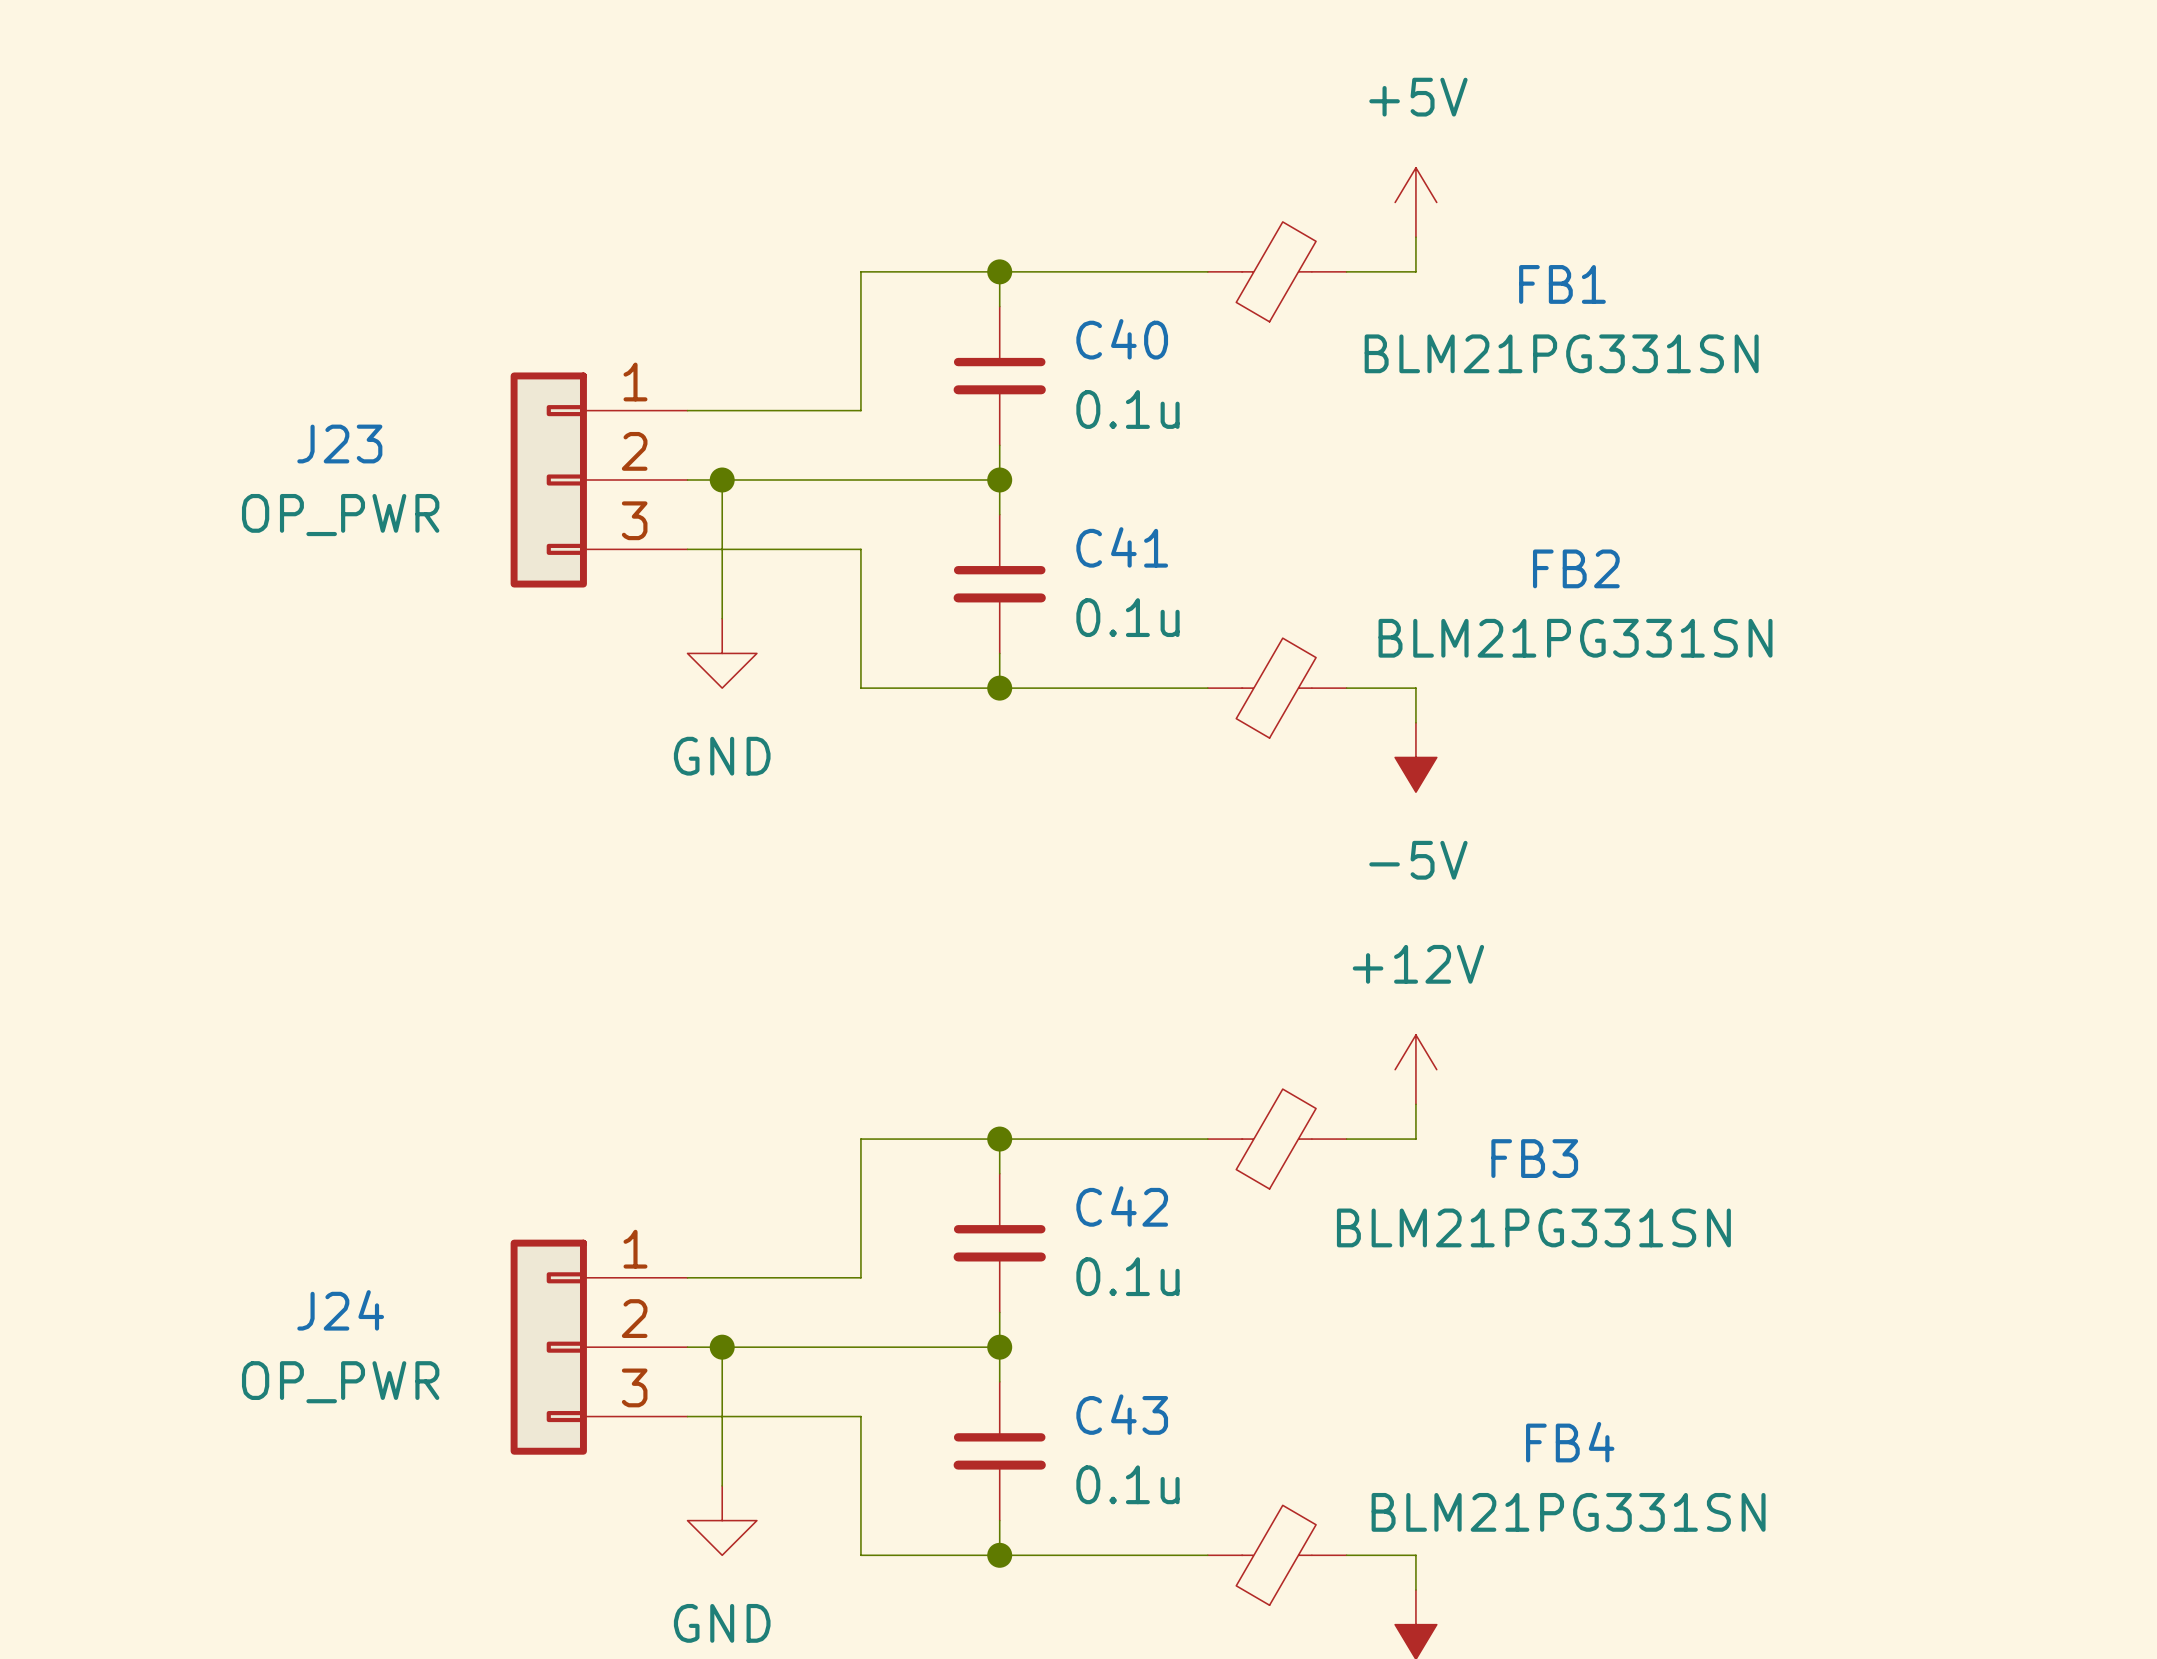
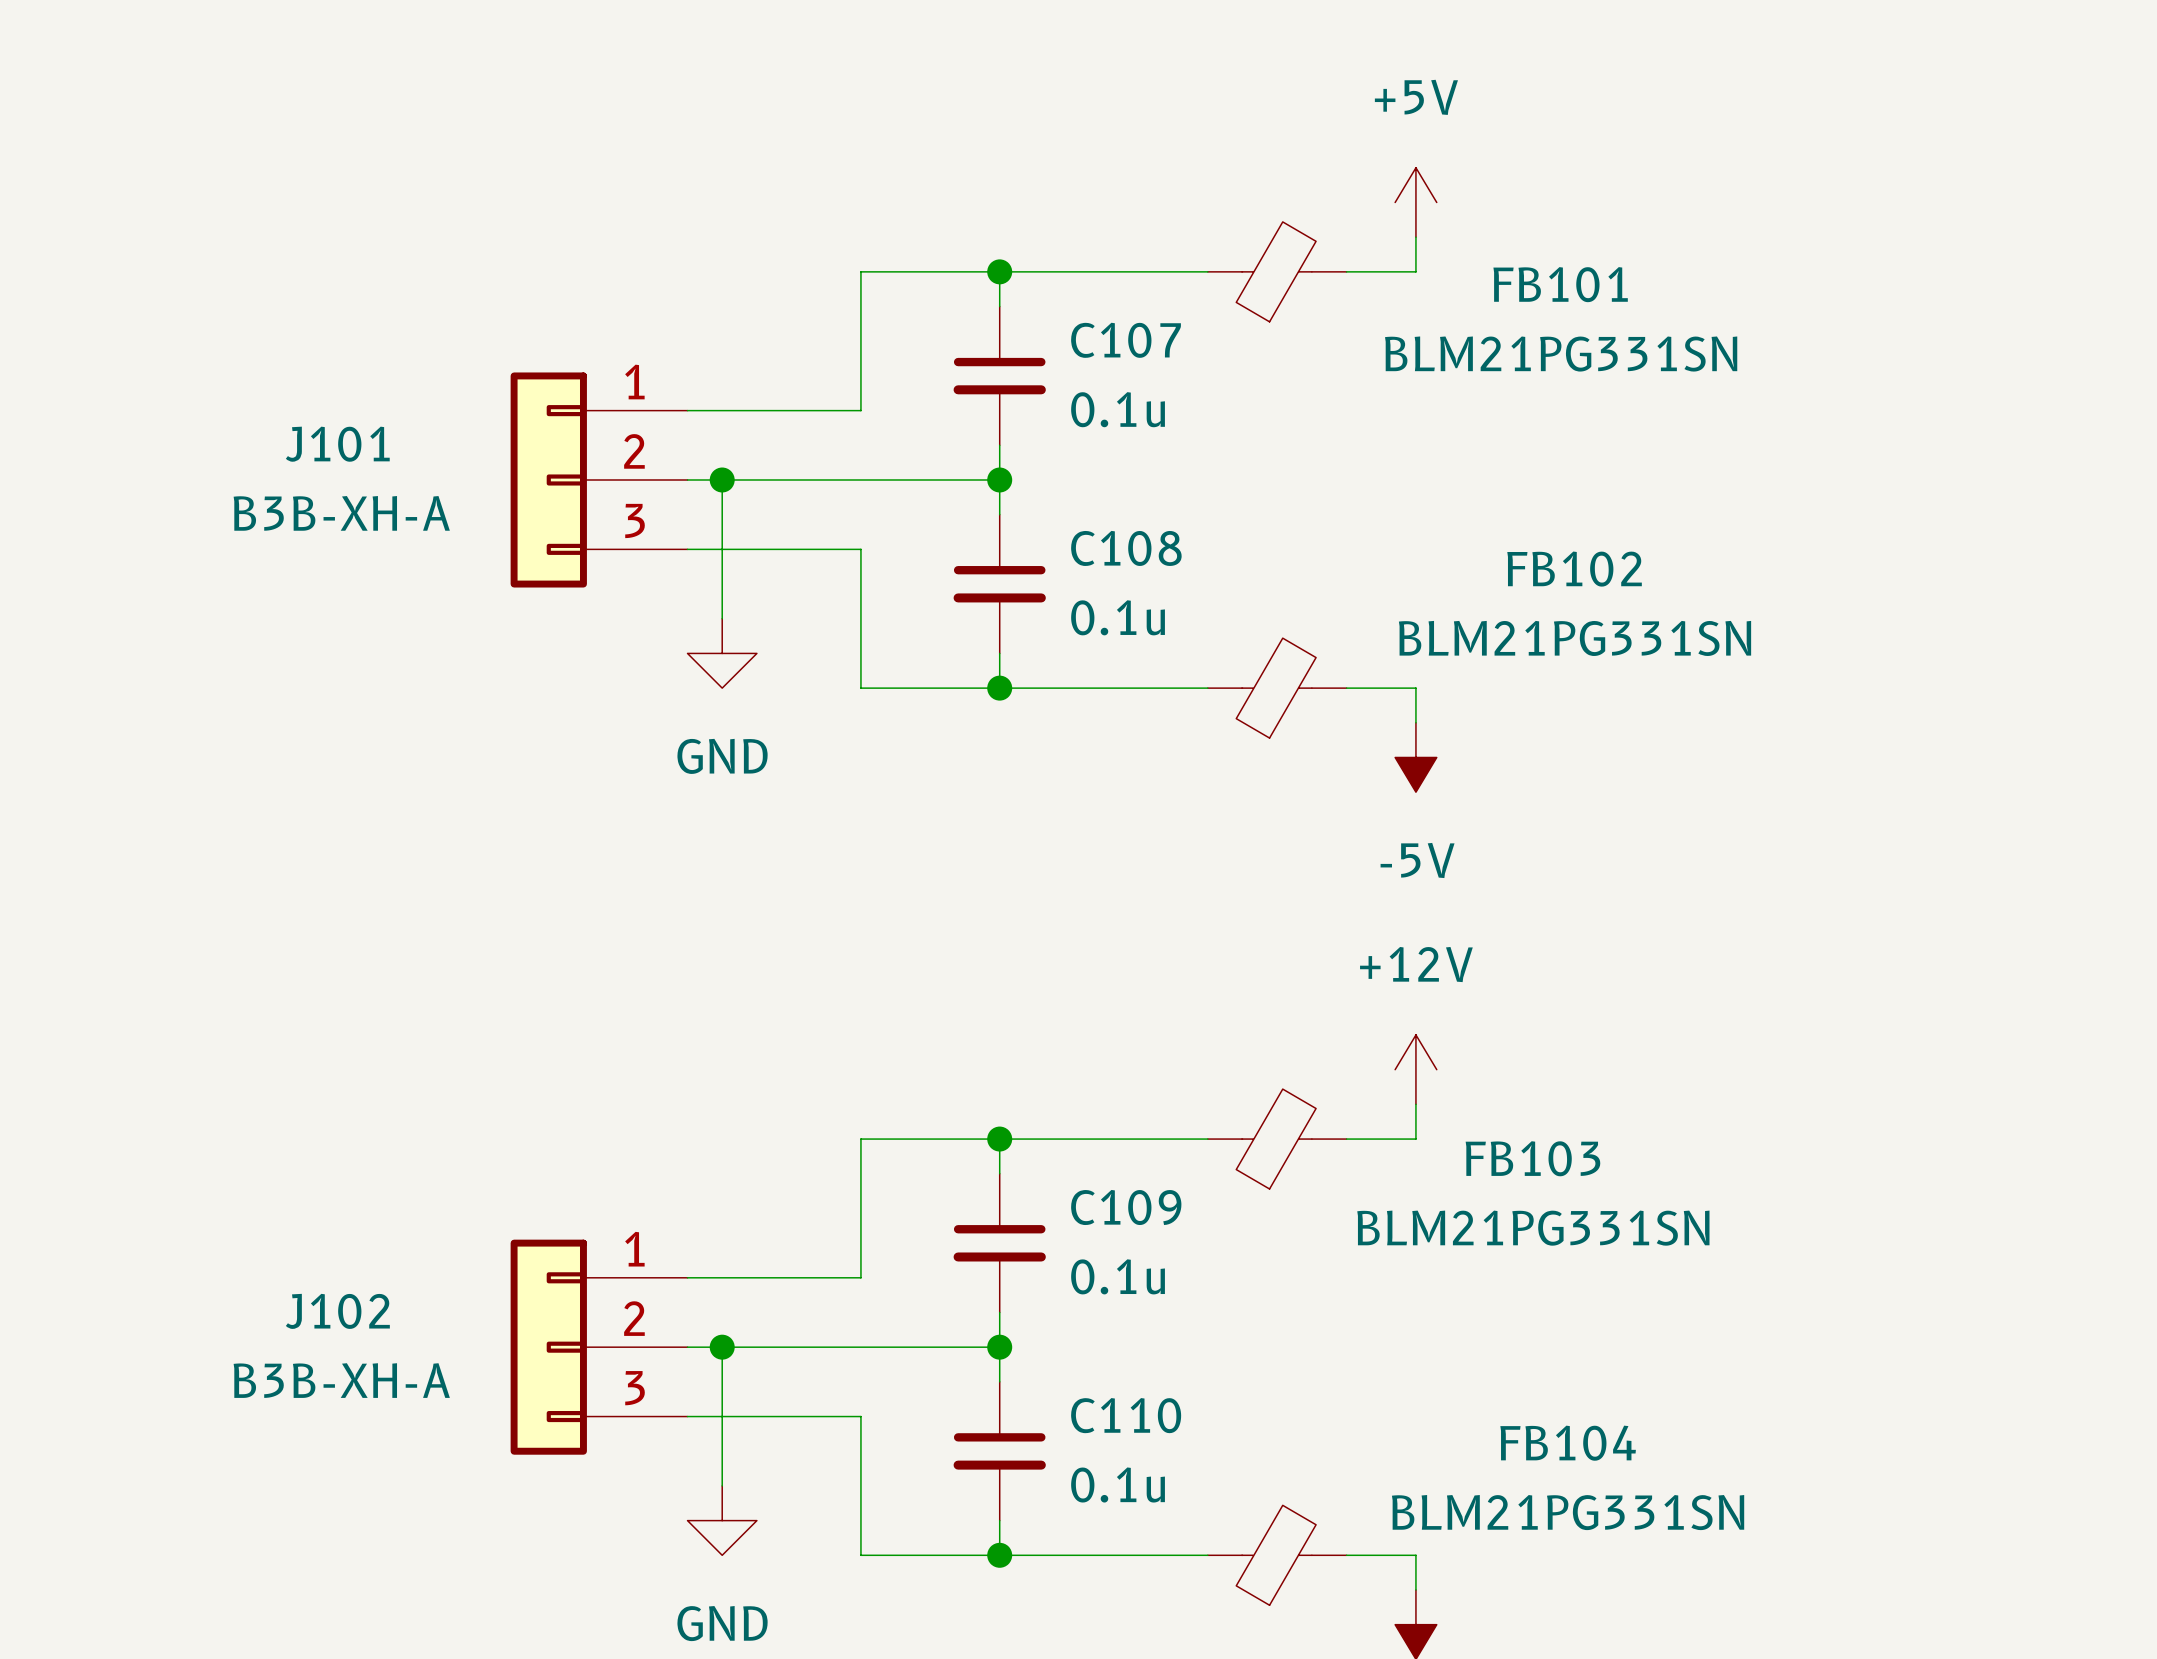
FB1 name: FB1 (1562, 284) -> FB101 (1560, 284)
C40 name: C40 (1122, 339) -> C107 (1126, 340)
J23 name: J23 (339, 444) -> J101 (337, 444)
J23 value: OP_PWR (340, 515) -> B3B-XH-A (341, 513)
C41 name: C41 (1122, 547) -> C108 (1126, 548)
FB2 name: FB2 (1576, 568) -> FB102 (1574, 569)
FB3 name: FB3 (1534, 1158) -> FB103 (1532, 1158)
C42 name: C42 (1122, 1206) -> C109 (1126, 1207)
J24 name: J24 (340, 1310) -> J102 (337, 1311)
J24 value: OP_PWR (340, 1382) -> B3B-XH-A (341, 1380)
C43 name: C43 (1122, 1414) -> C110 (1126, 1415)
FB4 name: FB4 (1570, 1442) -> FB104 (1568, 1443)

